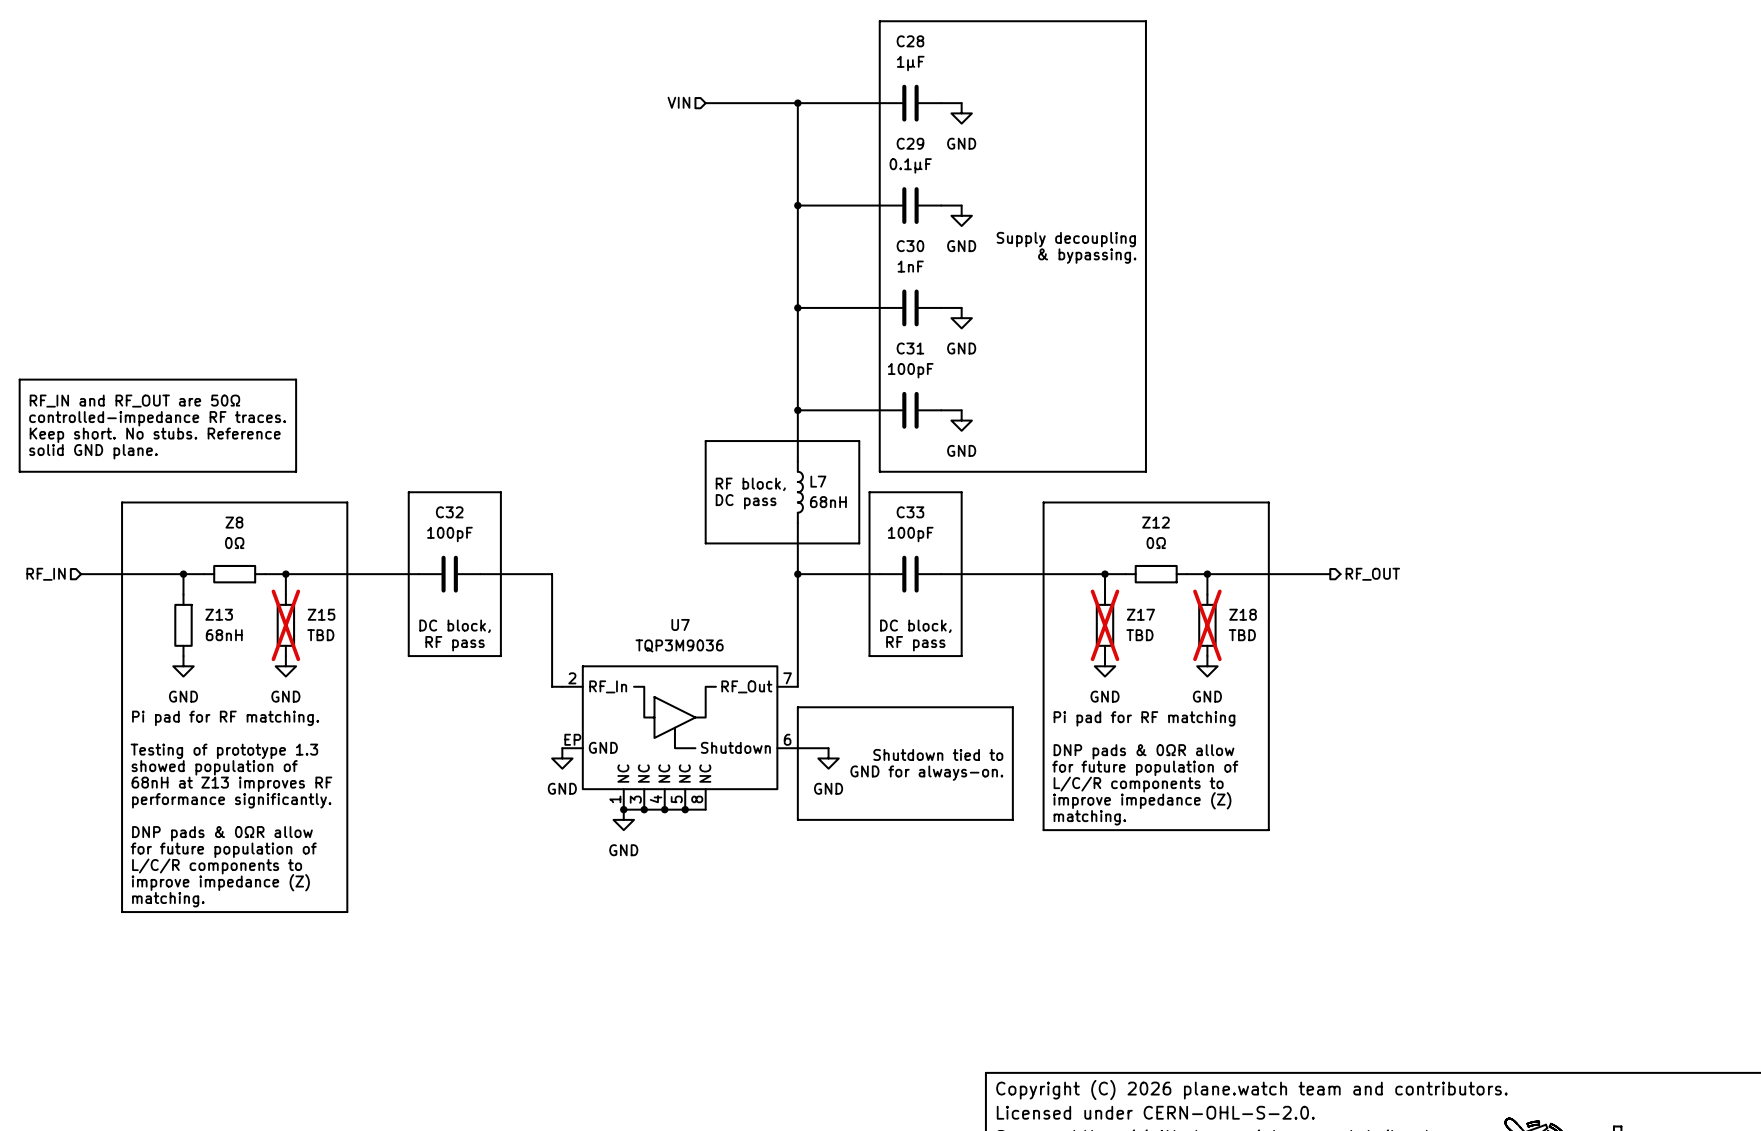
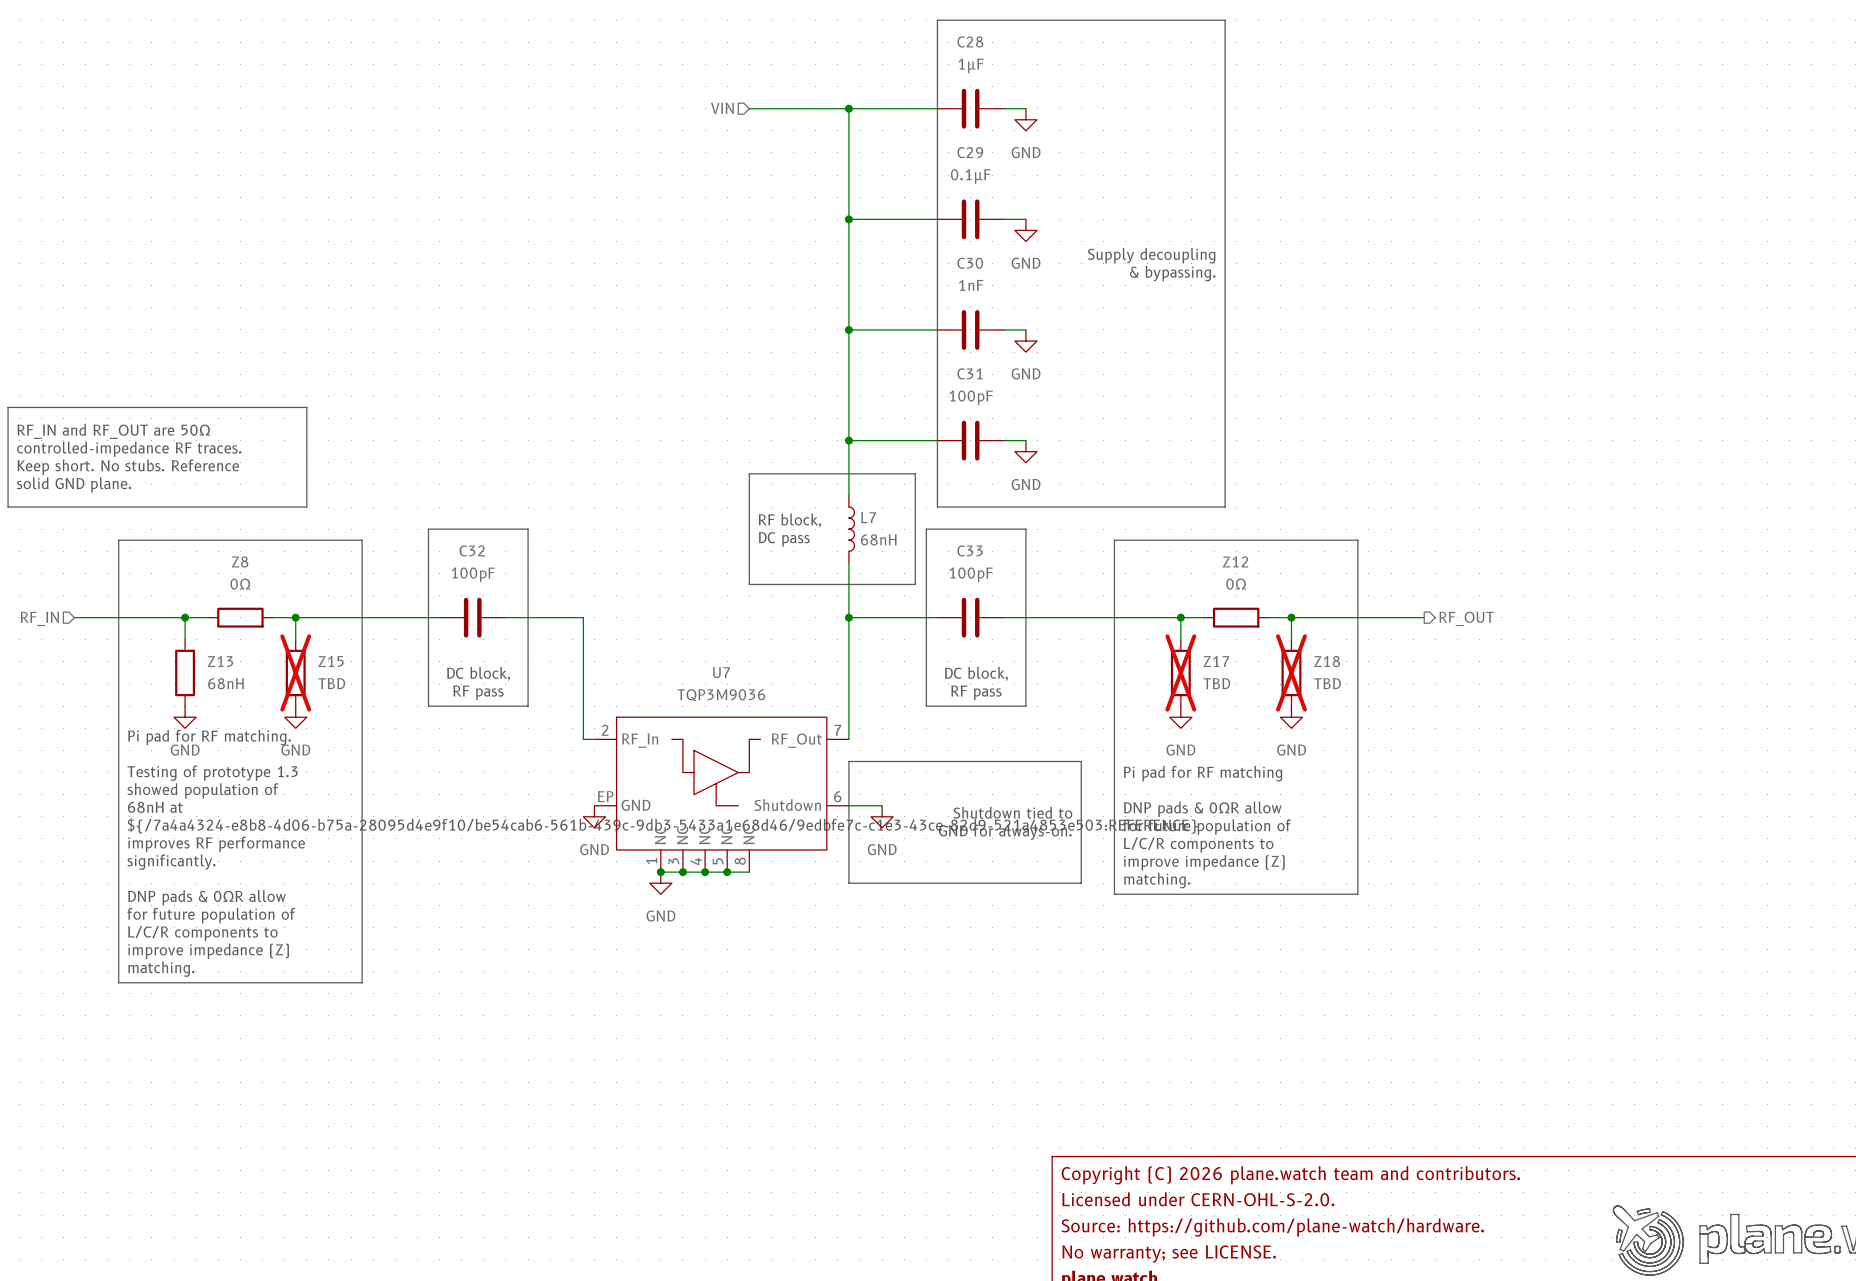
text: none -> Pi pad for RF matching. (209, 737)
text: Pi pad for RF matching. (225, 718) -> Testing of prototype 1.3 (212, 773)
text: none -> showed population of (203, 790)
text: Testing of prototype 1.3 (224, 751) -> 68nH at (155, 807)
text: showed population of (214, 767) -> ${/7a4a4324-e8b8-4d06-b75a-28095d4e9f10/be54cab6-561b-439c-9db3-5433a1e68d46/9edbfe7c-c1e3-43ce-82d9-521a4853e503:REFERENCE} (662, 825)
text: 68nH at Z13 improves RF (231, 784) -> improves RF performance (216, 844)
text: performance significantly. (231, 800) -> significantly. (171, 862)

